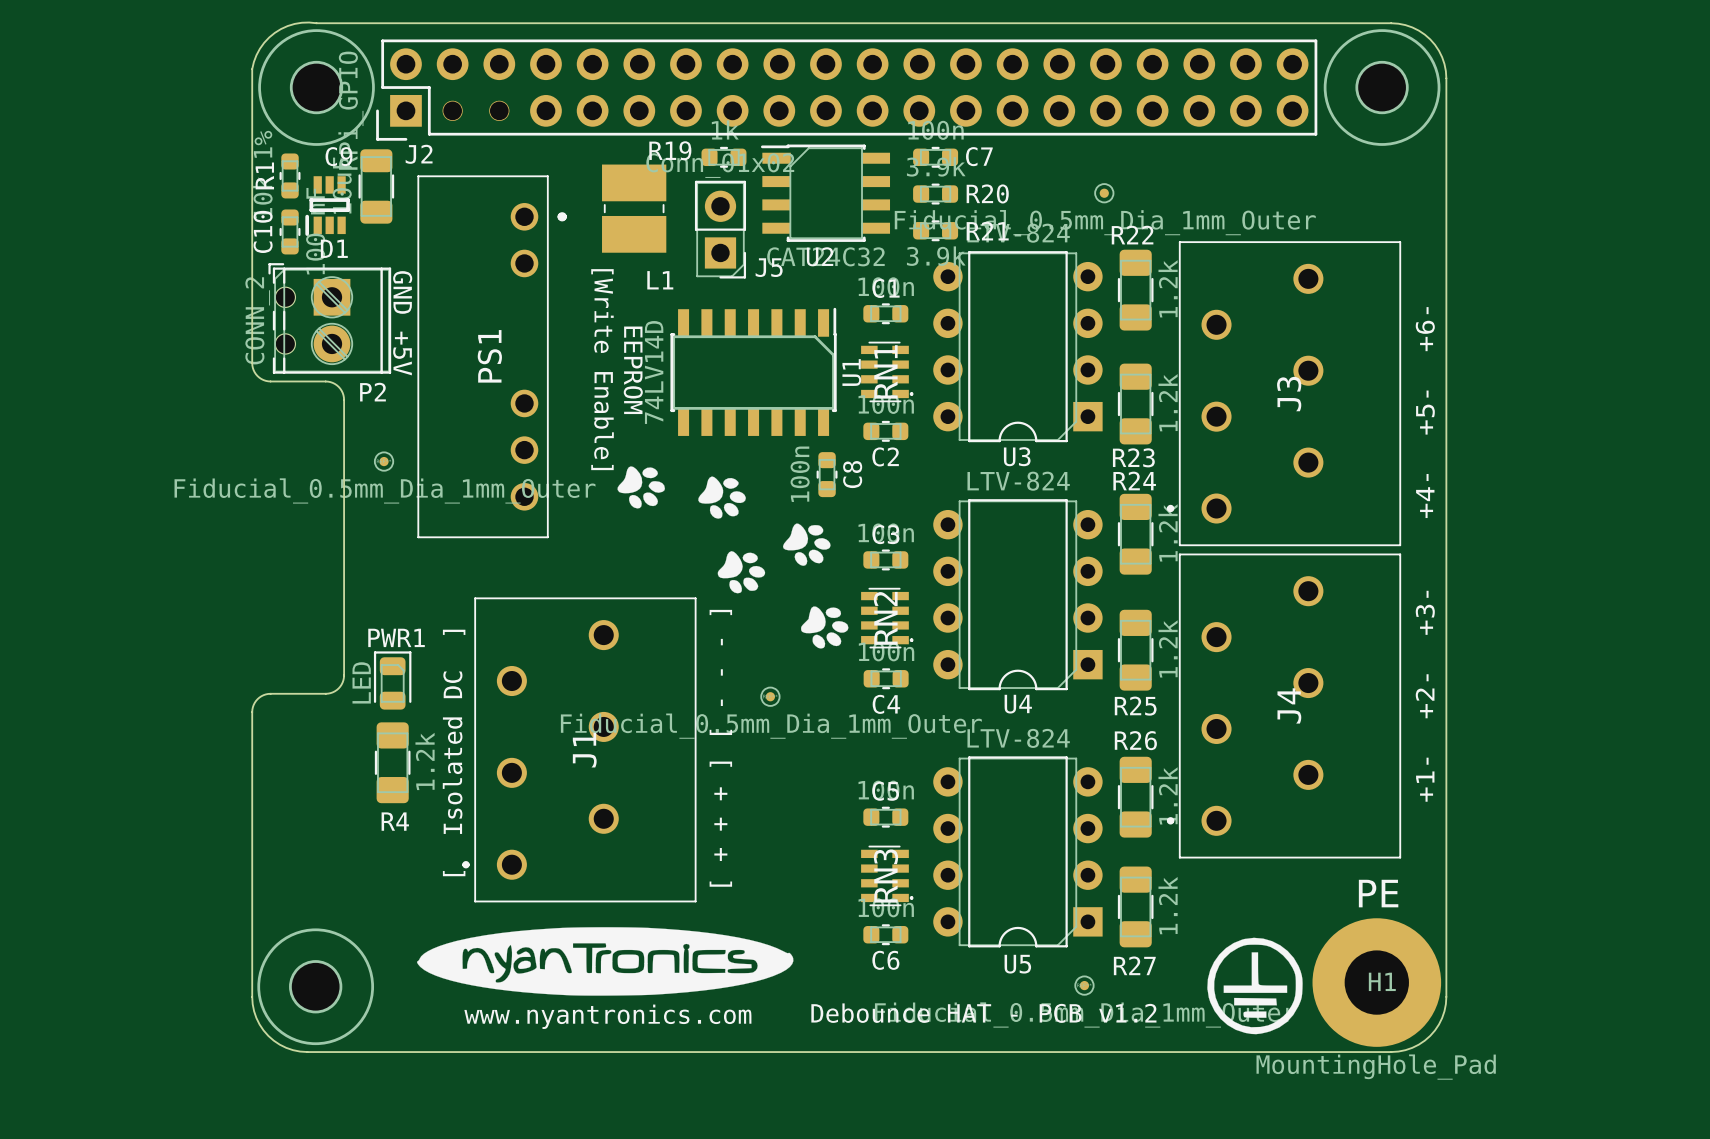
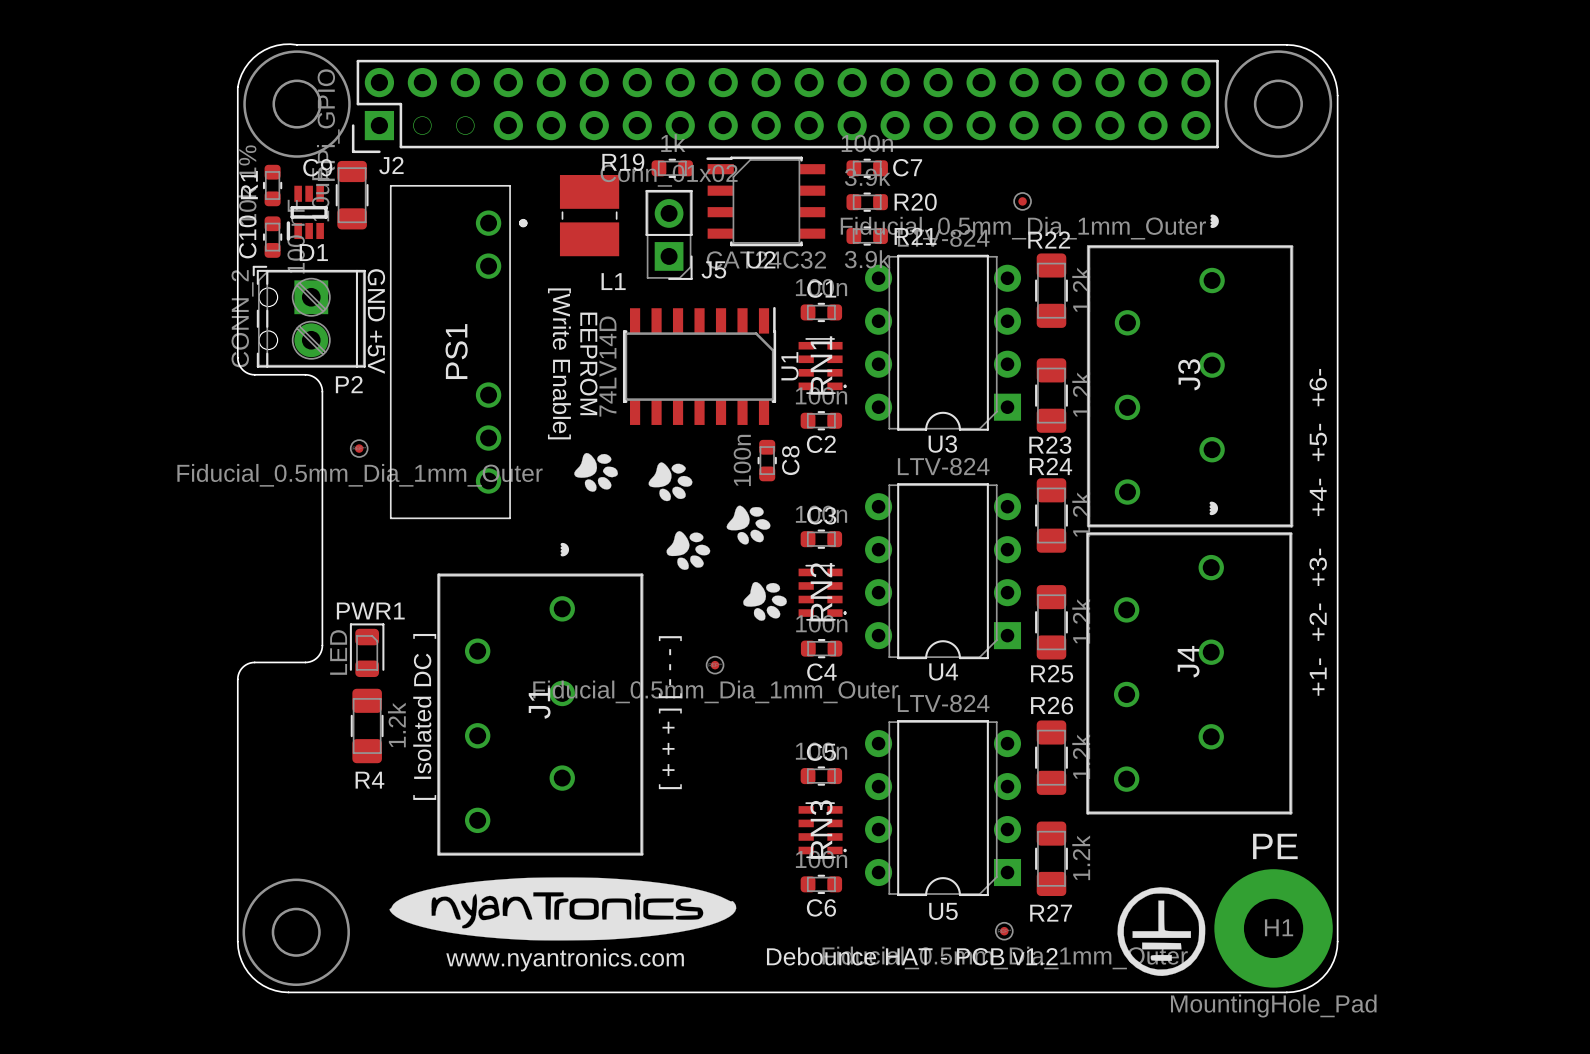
J3 footprint: [1166, 241, 1402, 547] -> [1086, 214, 1294, 528]
J4 footprint: [1166, 553, 1402, 859] -> [1086, 501, 1293, 815]
J1 footprint: [462, 597, 697, 903] -> [437, 542, 644, 856]

